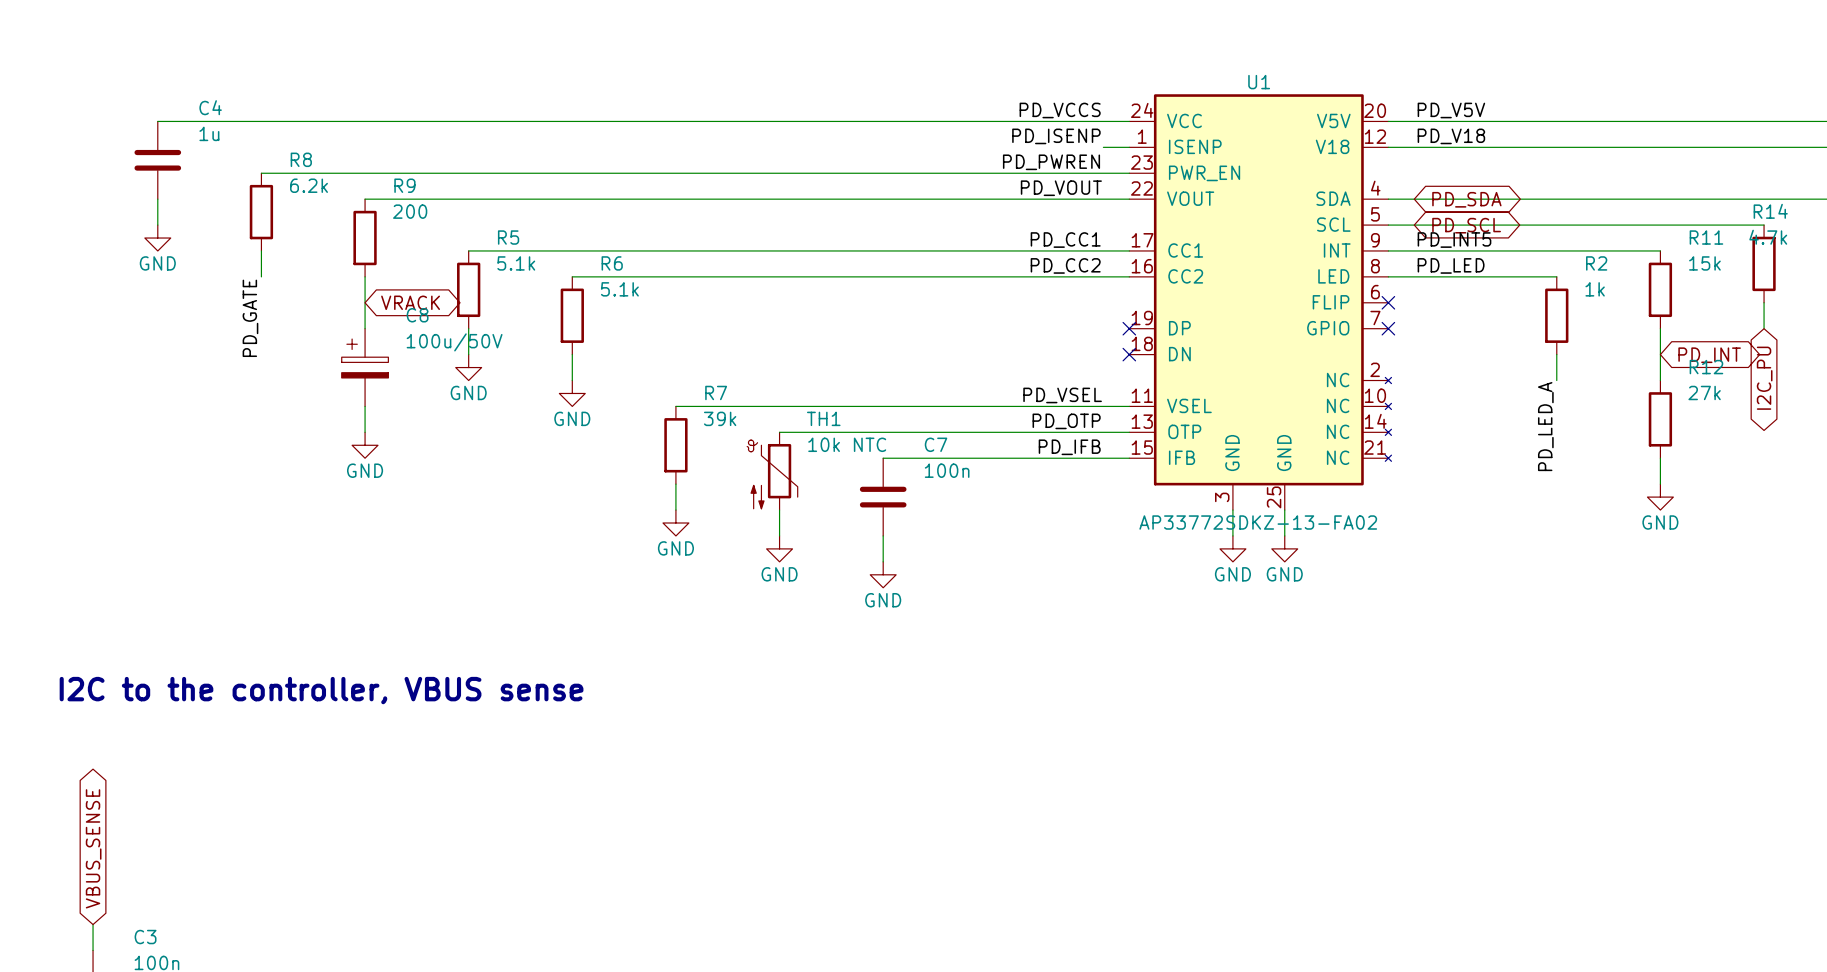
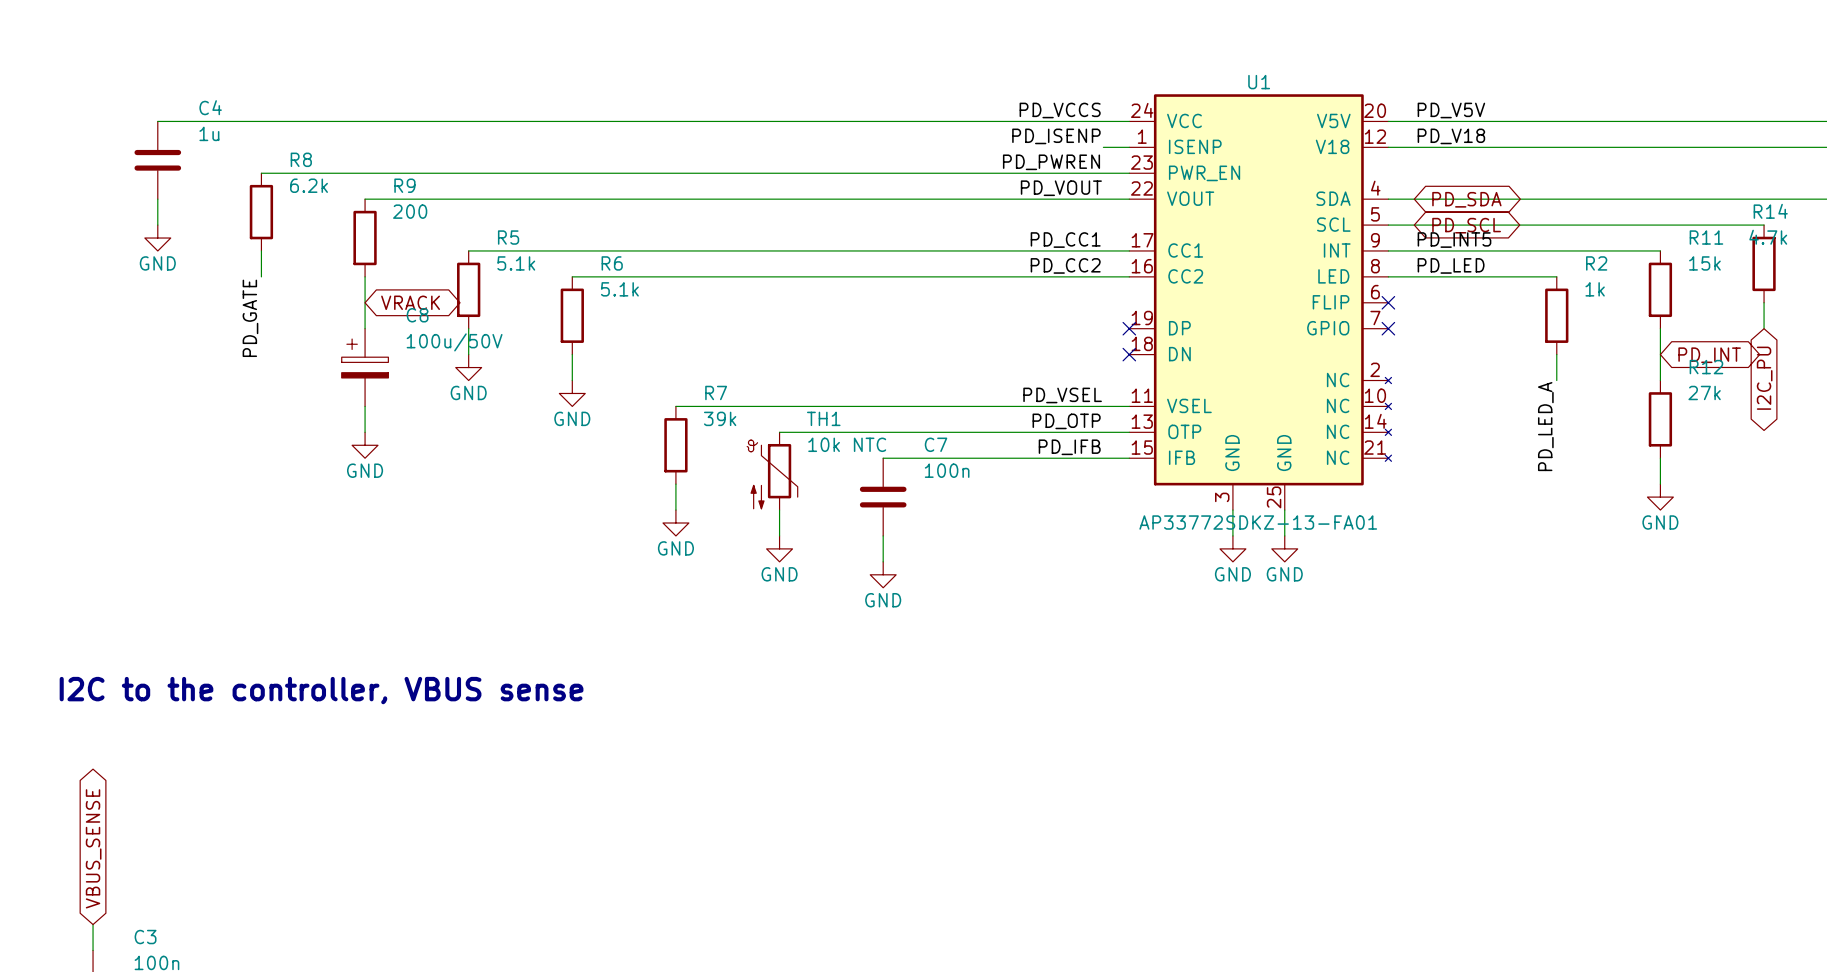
U1 value: AP33772SDKZ-13-FA02 (1258, 522) -> AP33772SDKZ-13-FA01 (1258, 522)

